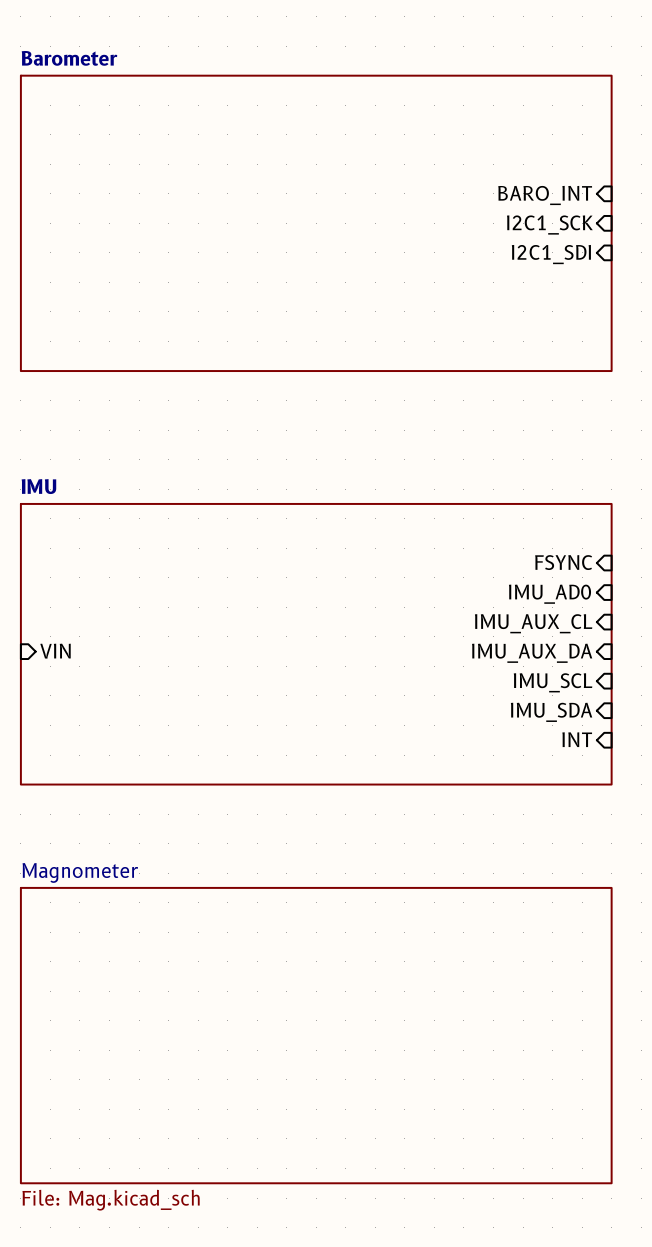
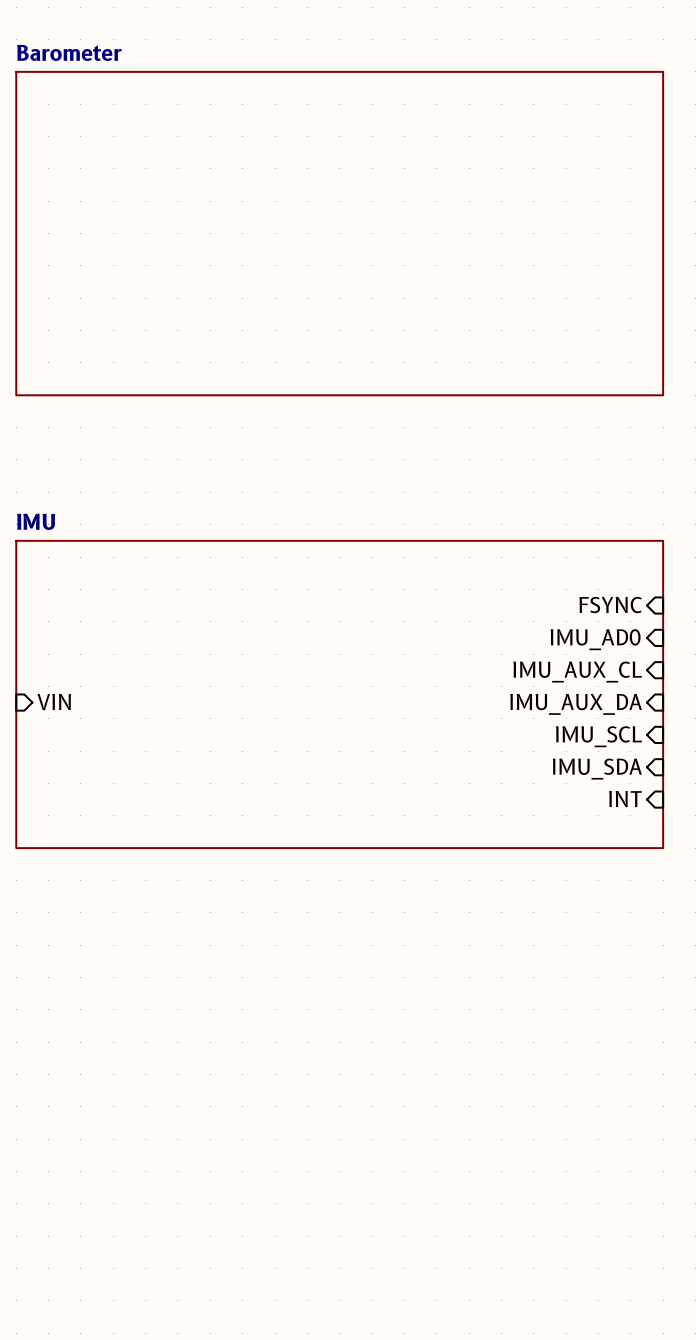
sheet pin: BARO_INT (545, 195) -> none
sheet pin: I2C1_SCK (549, 225) -> none
sheet pin: I2C1_SDI (551, 254) -> none
sheet Magnometer: File: Mag.kicad_sch (316, 1035) -> none

